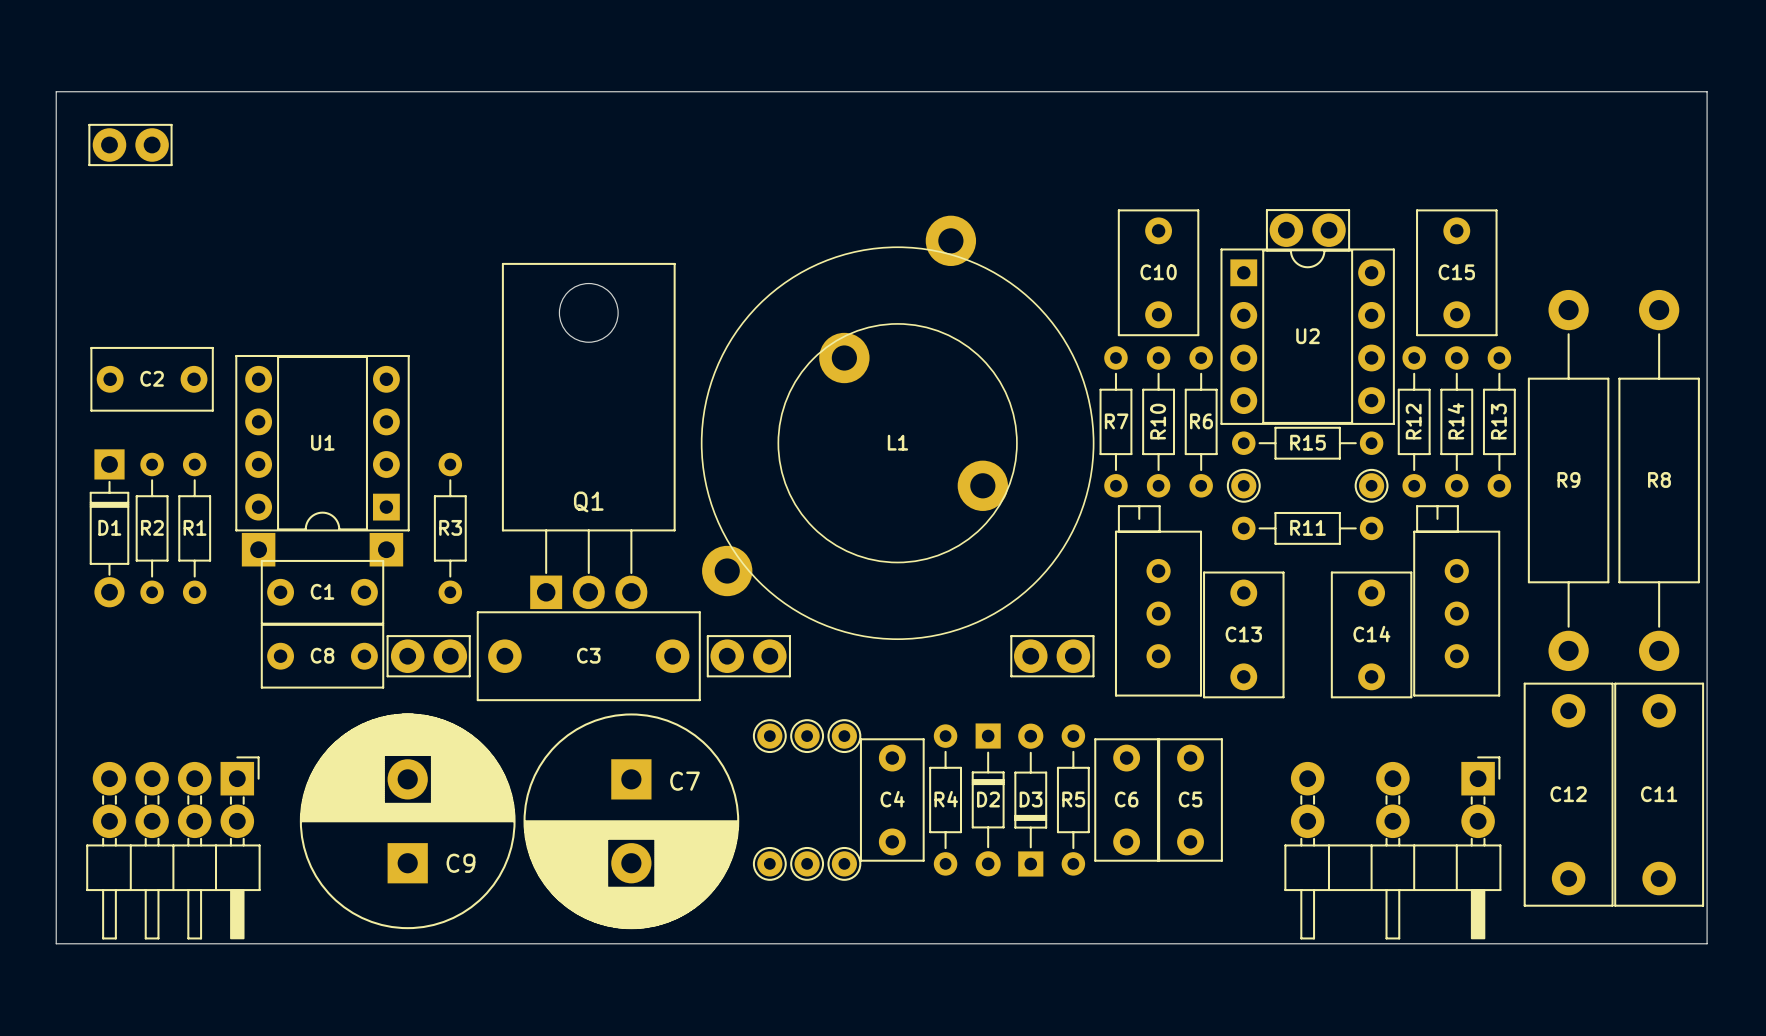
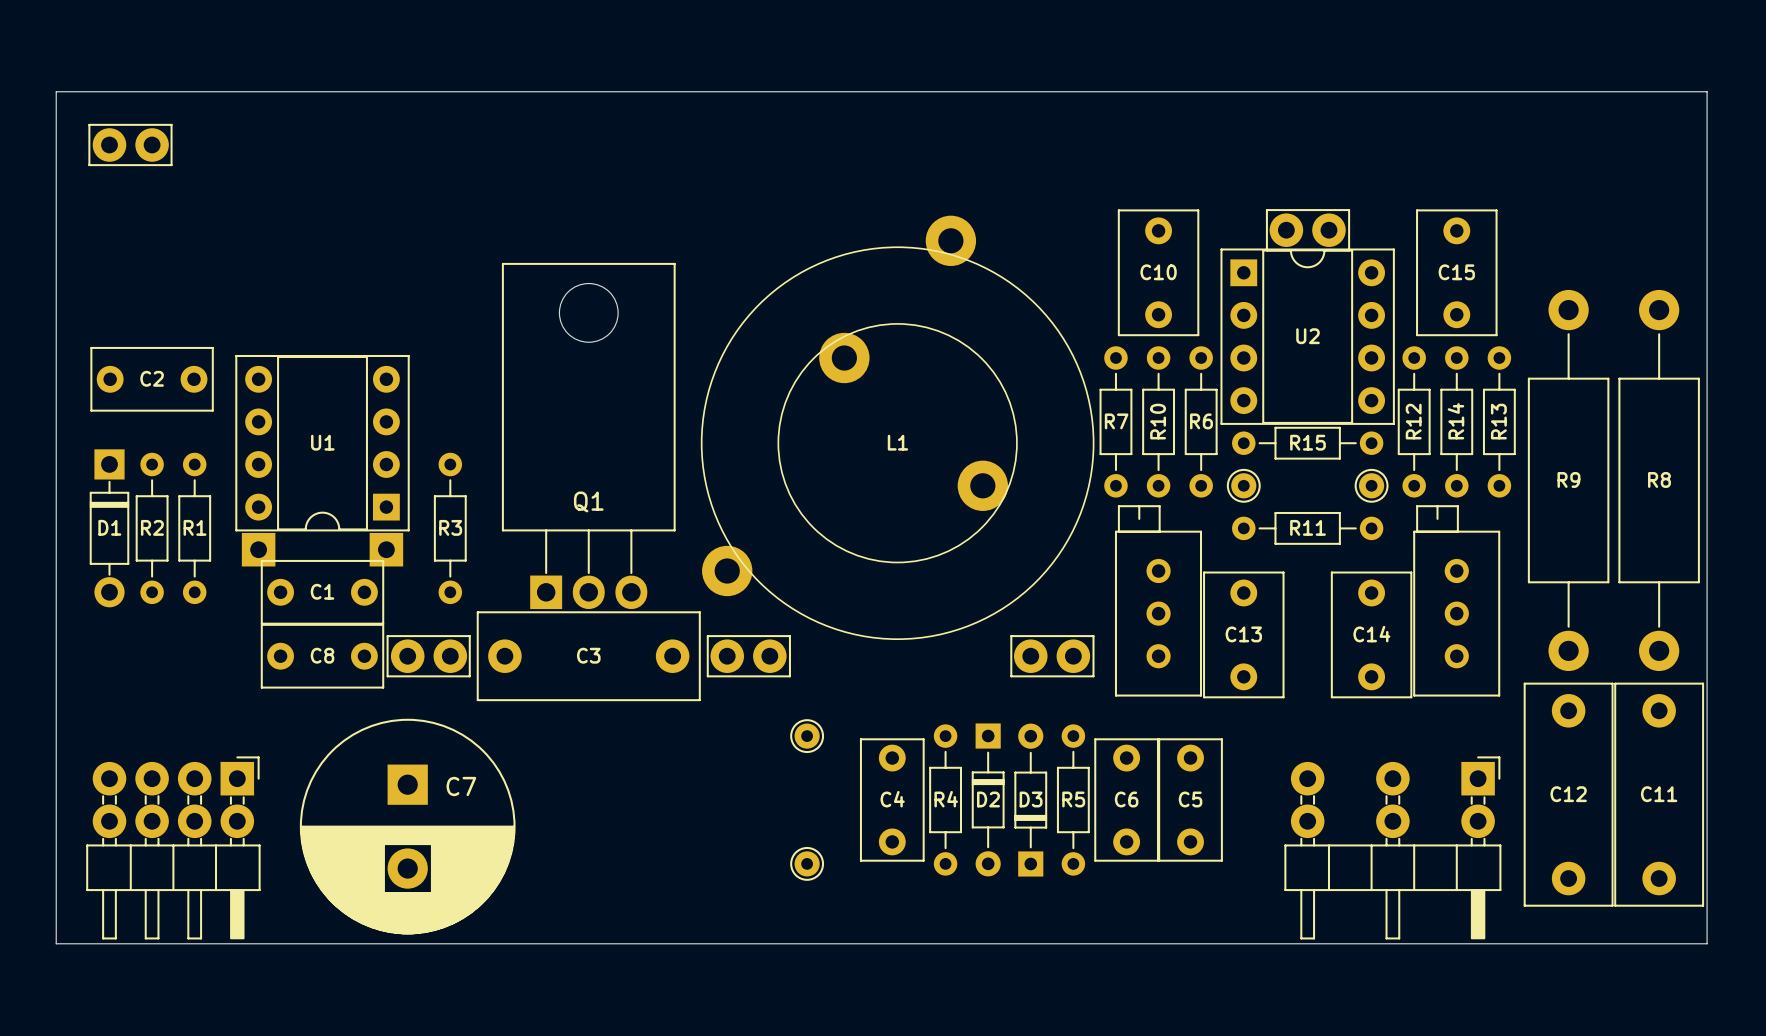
part: (769, 736) -> none
part: (844, 736) -> none
C9: (407, 821) -> none
C7 position: (631, 821) -> (407, 826)
part: (769, 863) -> none
part: (844, 863) -> none

